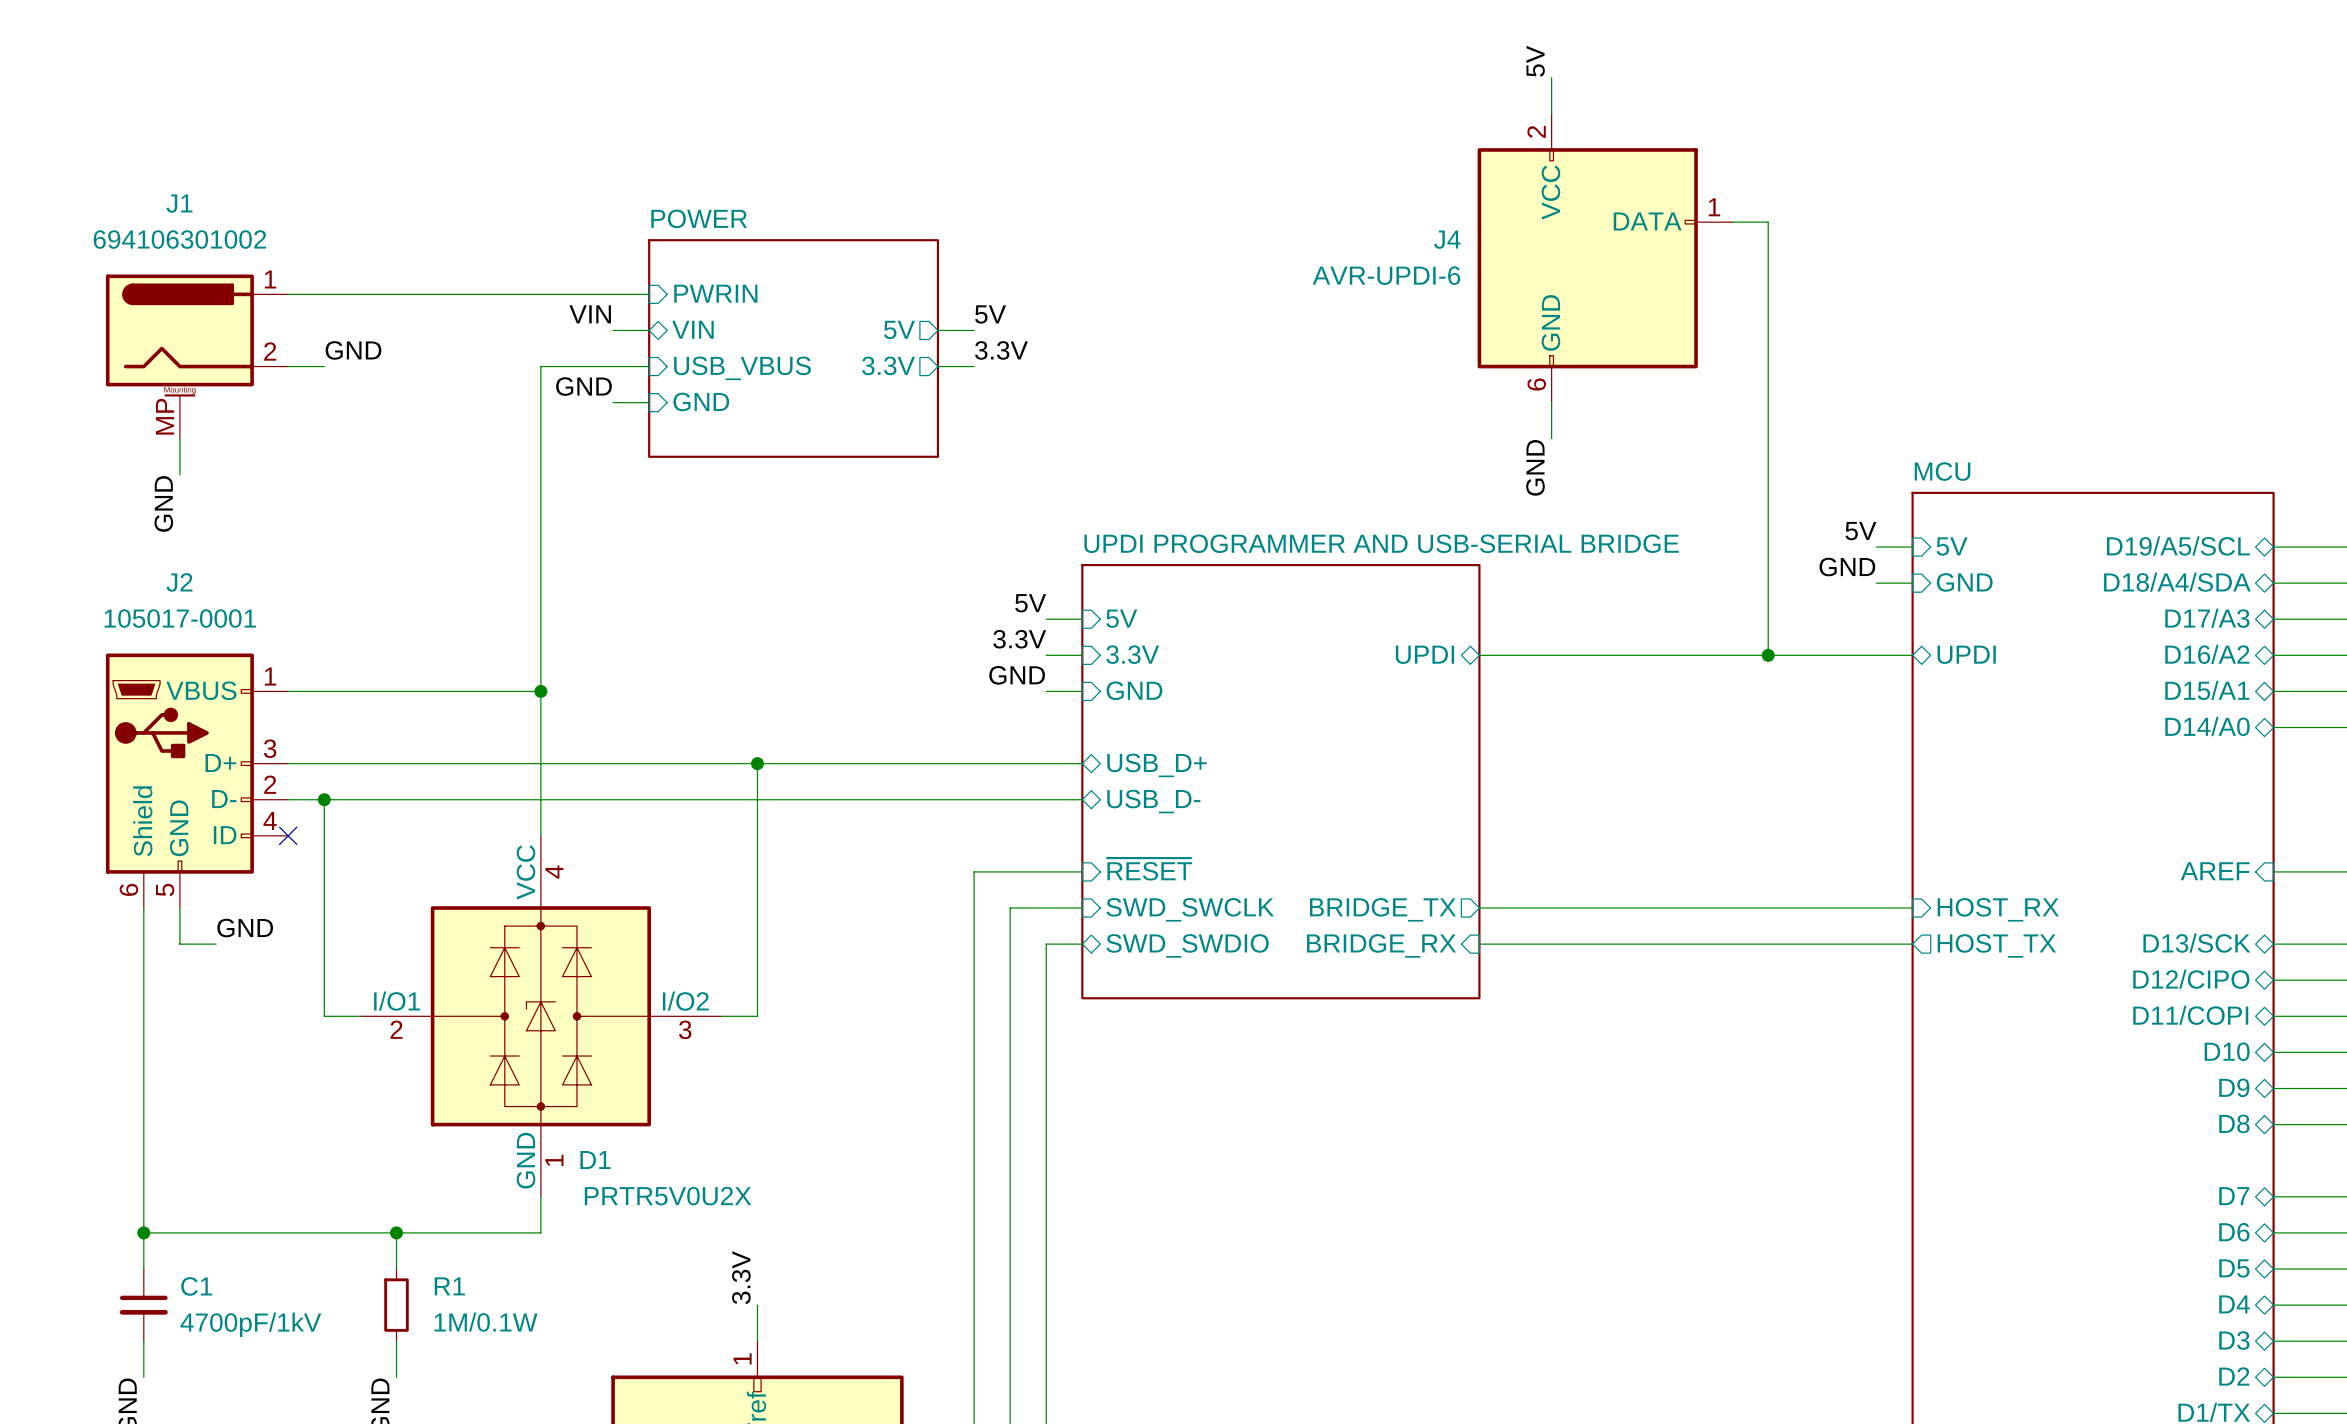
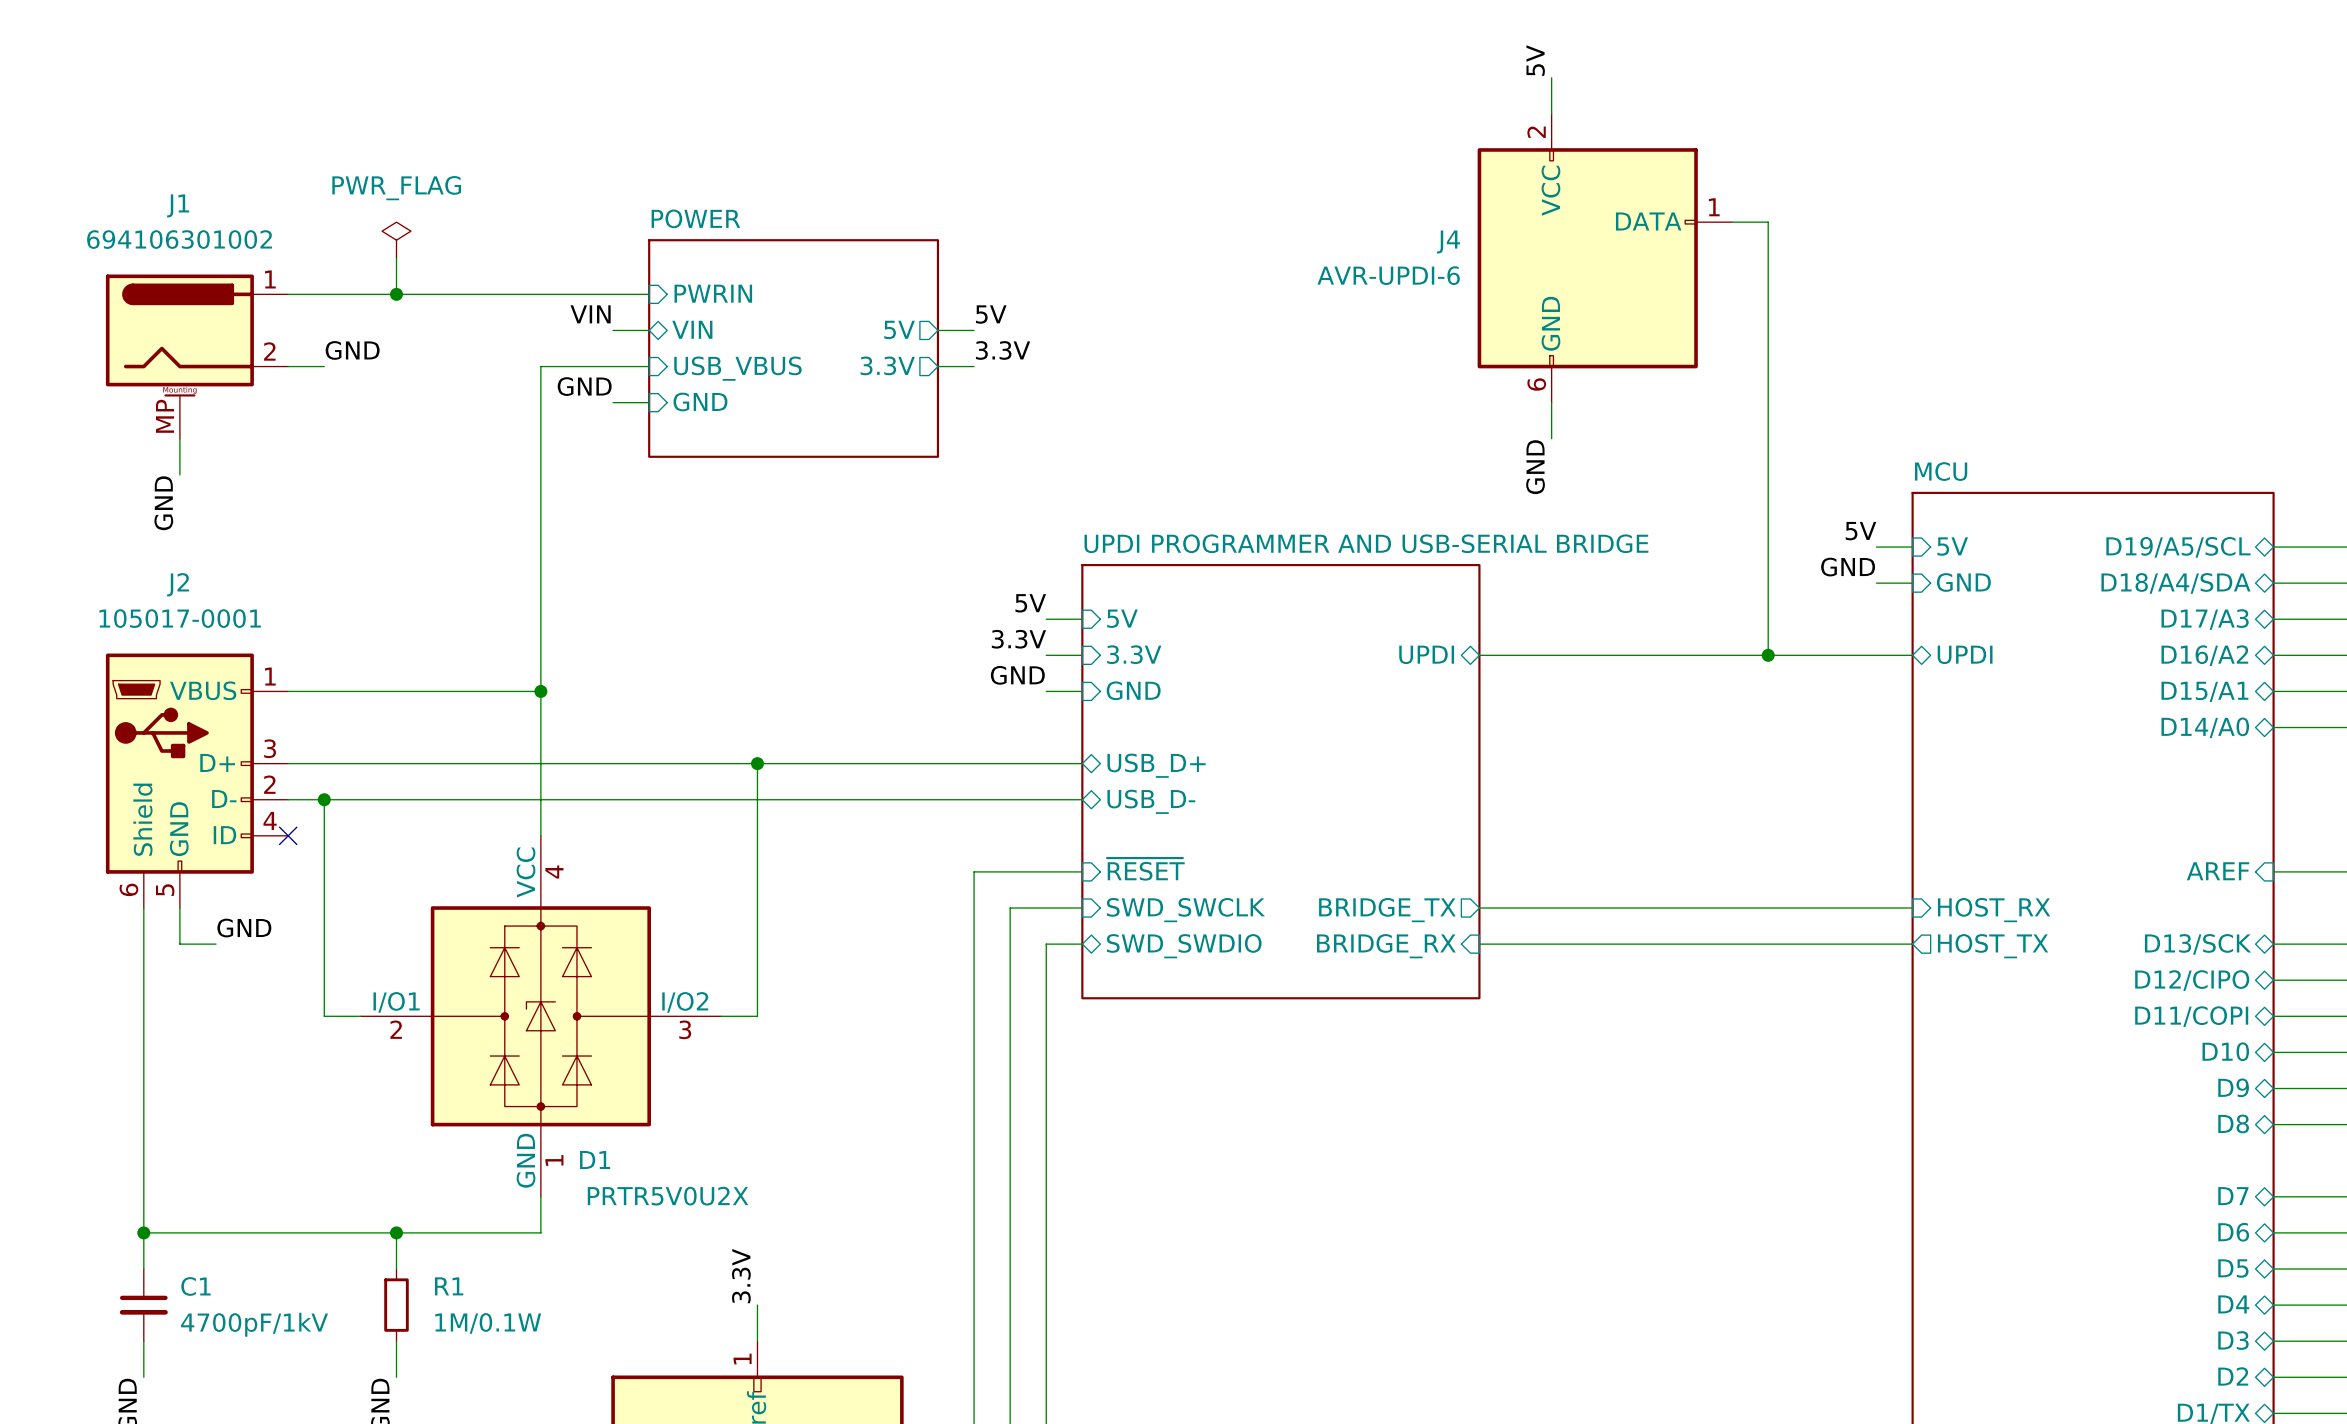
power symbol: none -> PWR_FLAG (396, 240)
wire: none -> (396, 258) (396, 294)
junction: none -> (396, 294)

